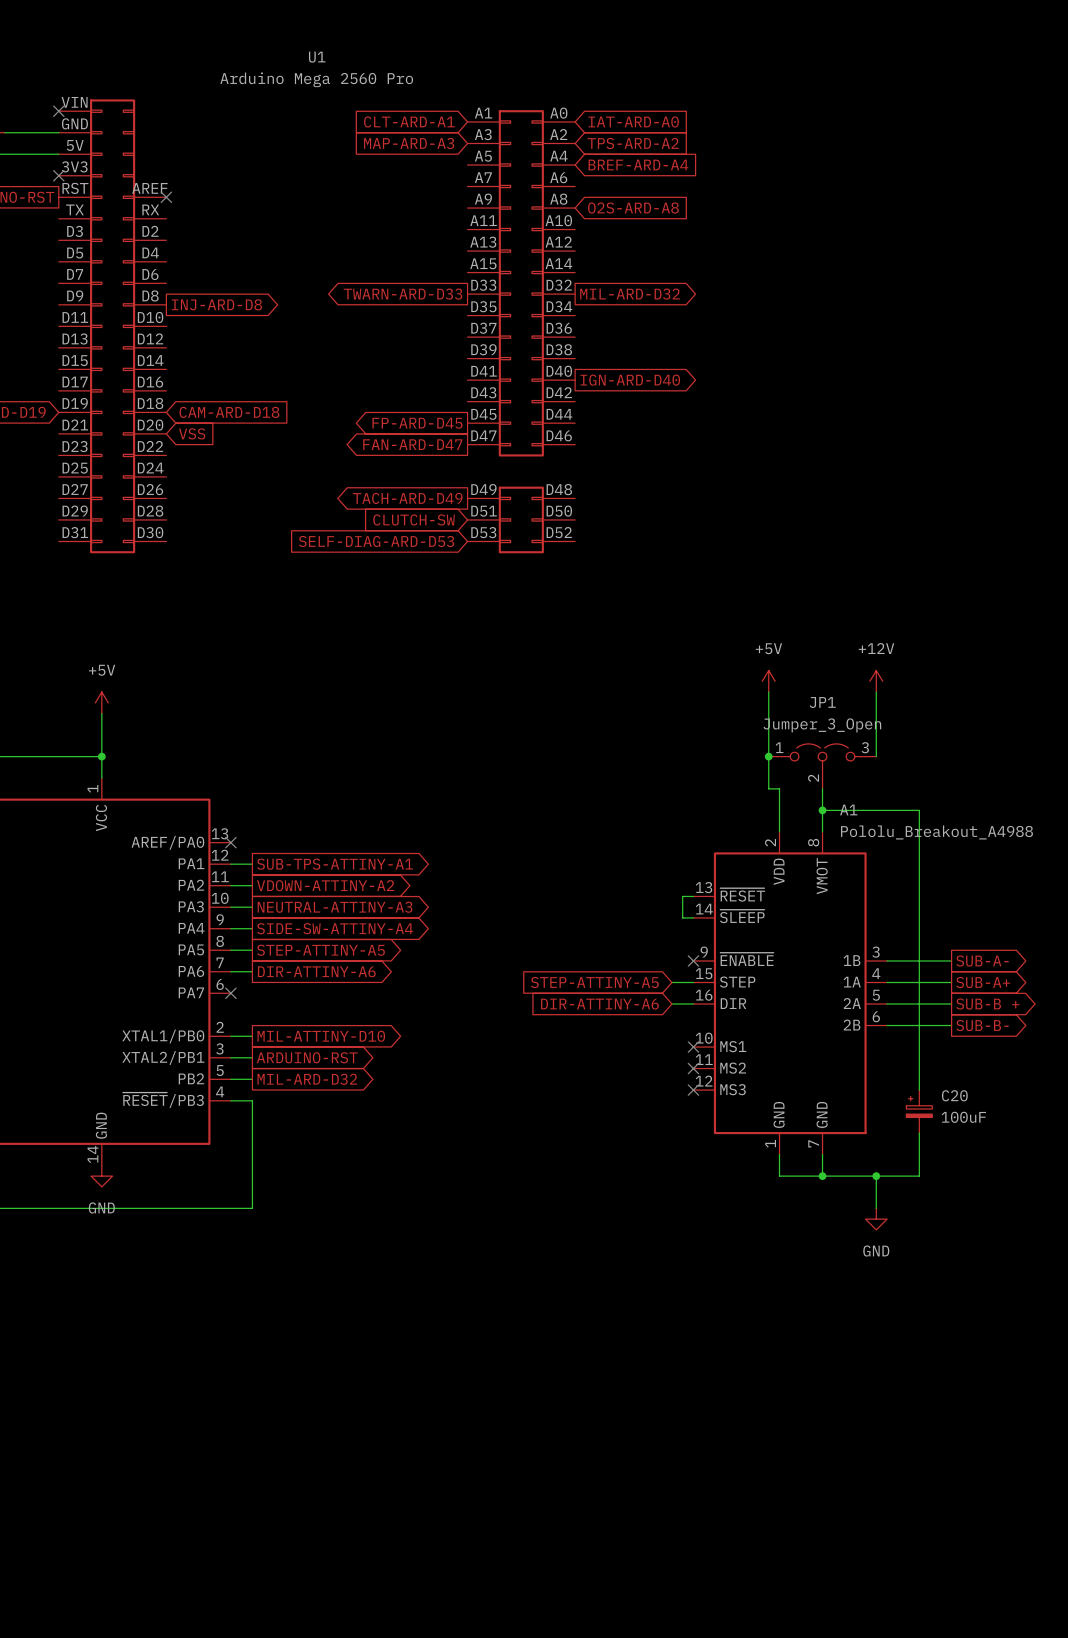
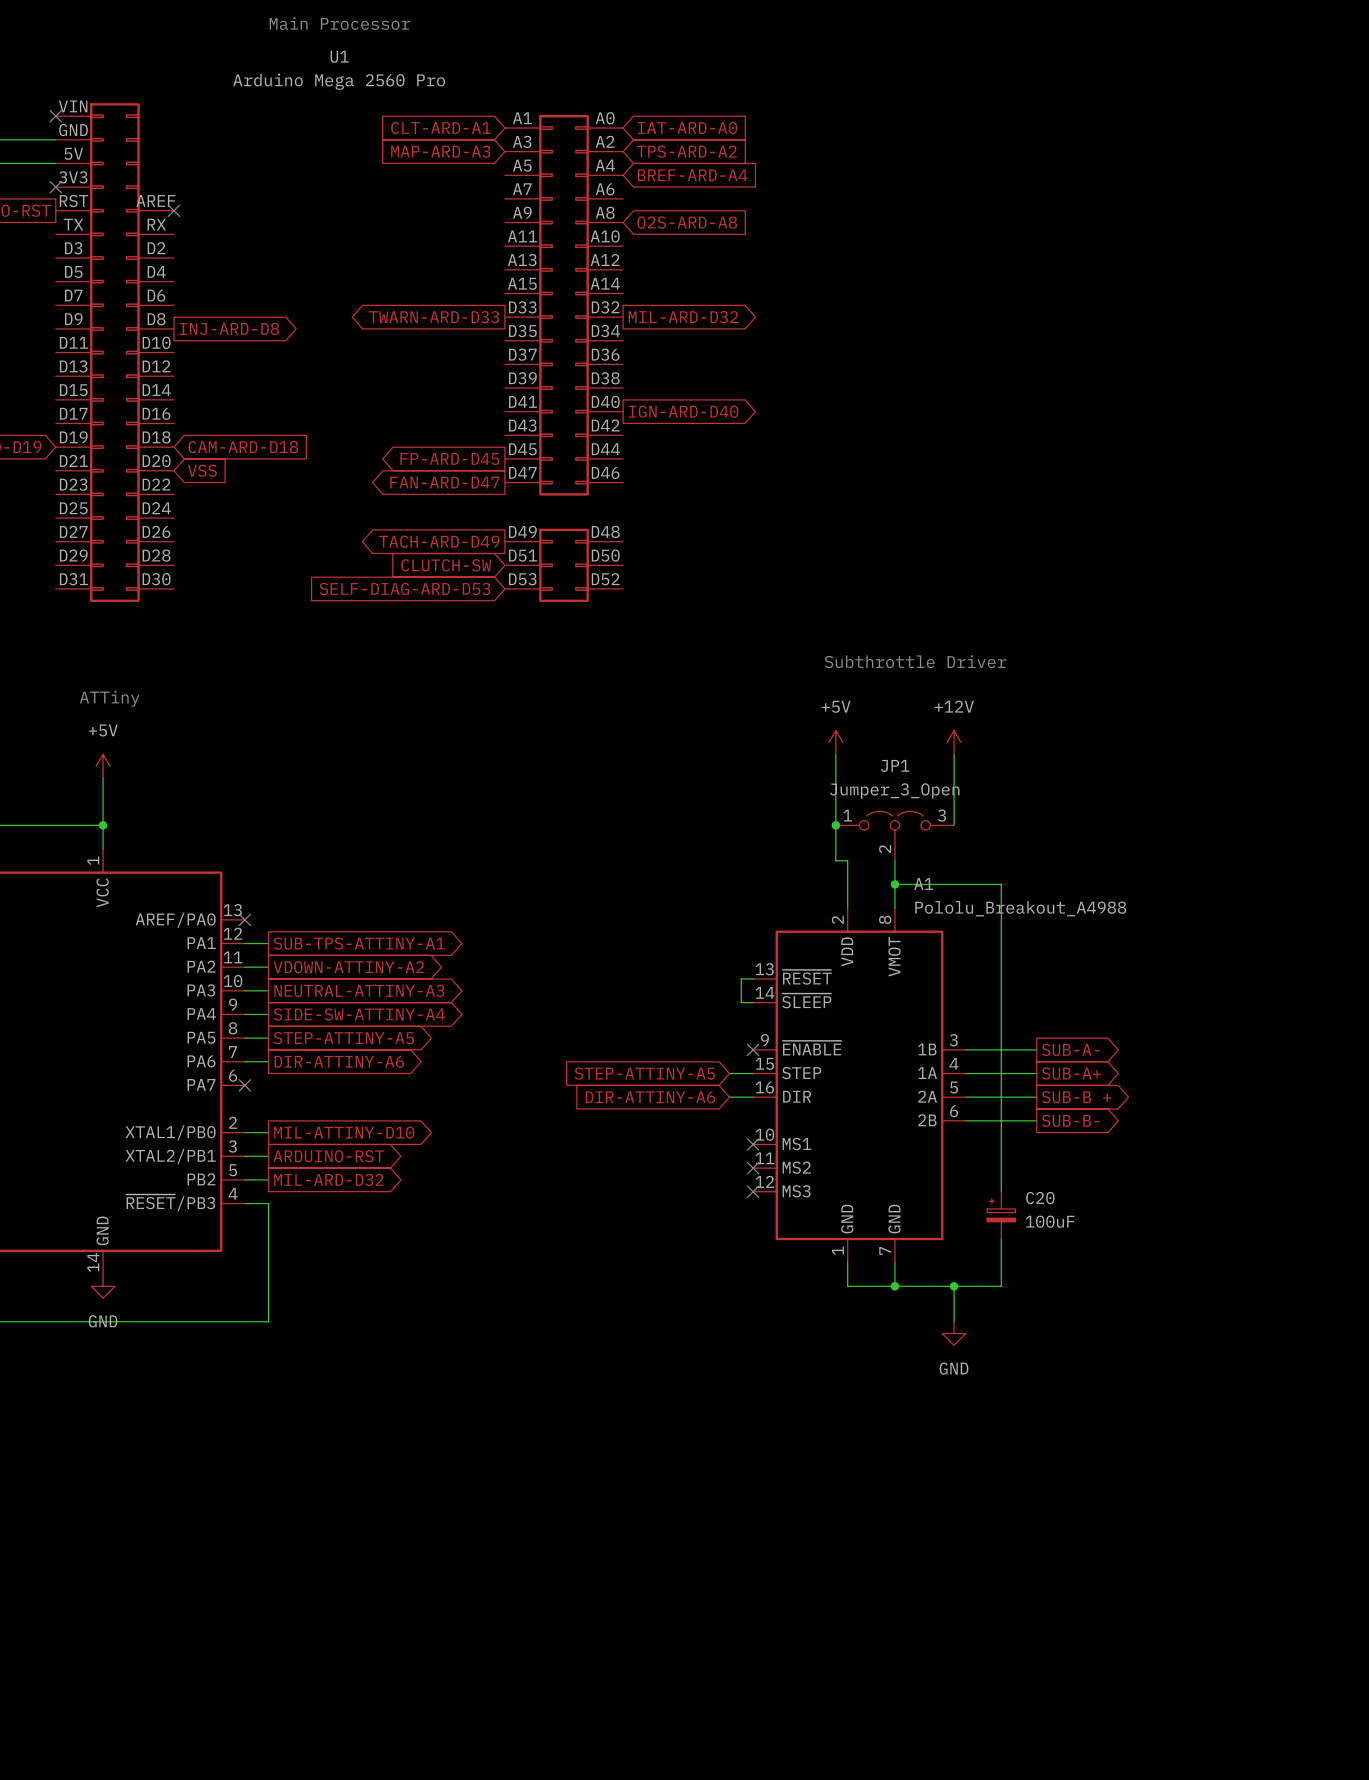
text: none -> Main Processor (339, 23)
text: none -> Subthrottle Driver (915, 661)
text: none -> ATTiny (109, 698)

